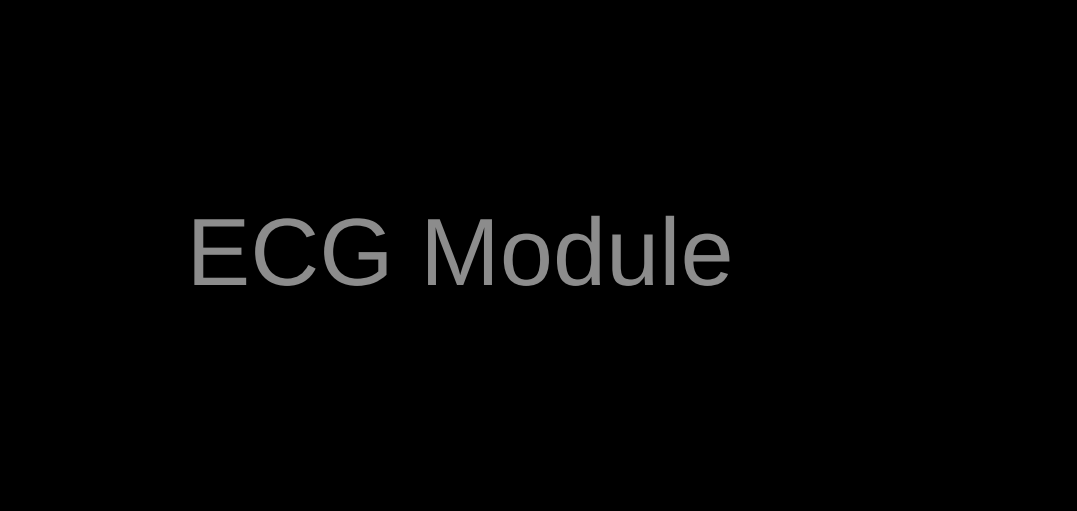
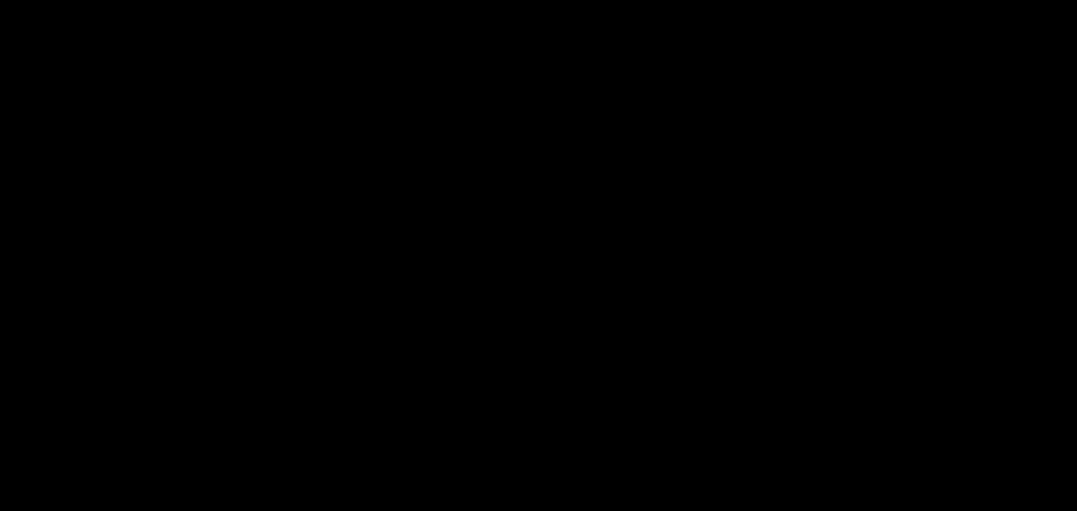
text: ECG Module (461, 250) -> none

